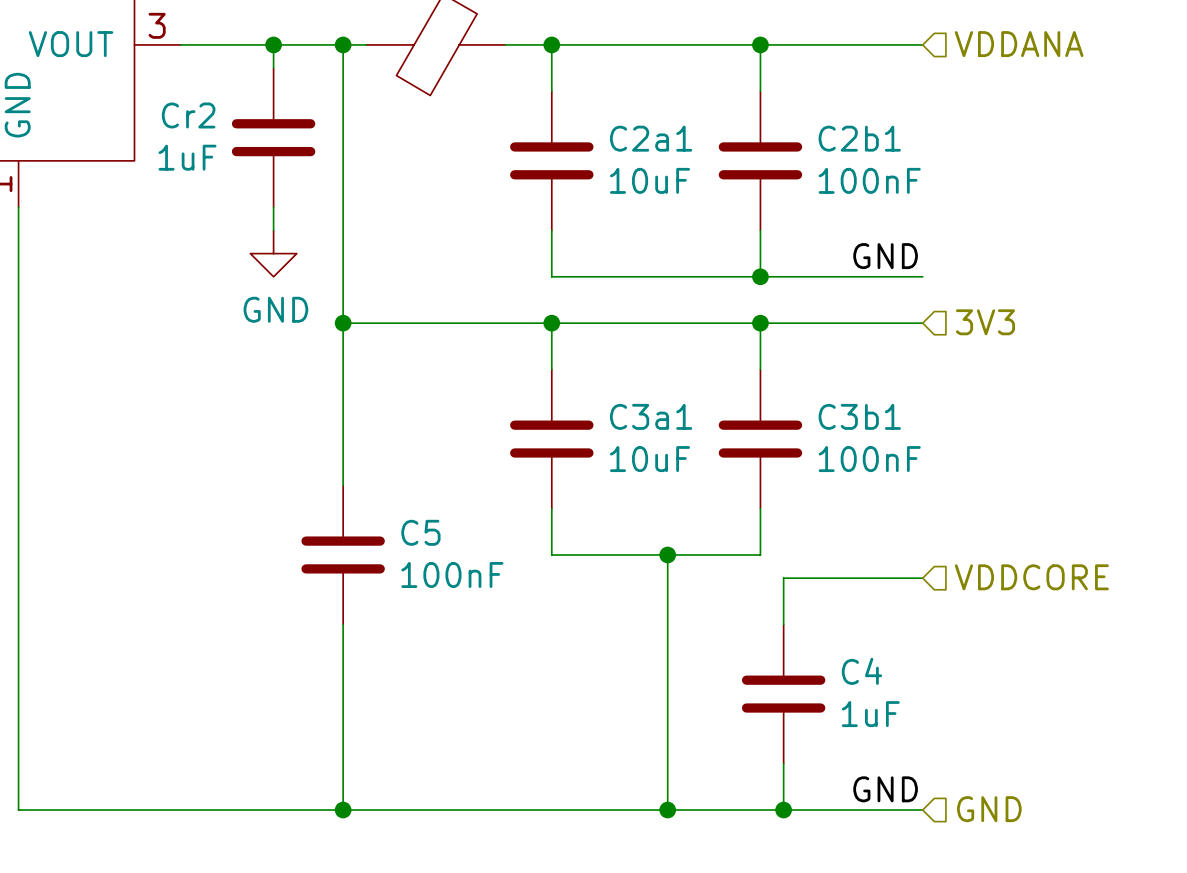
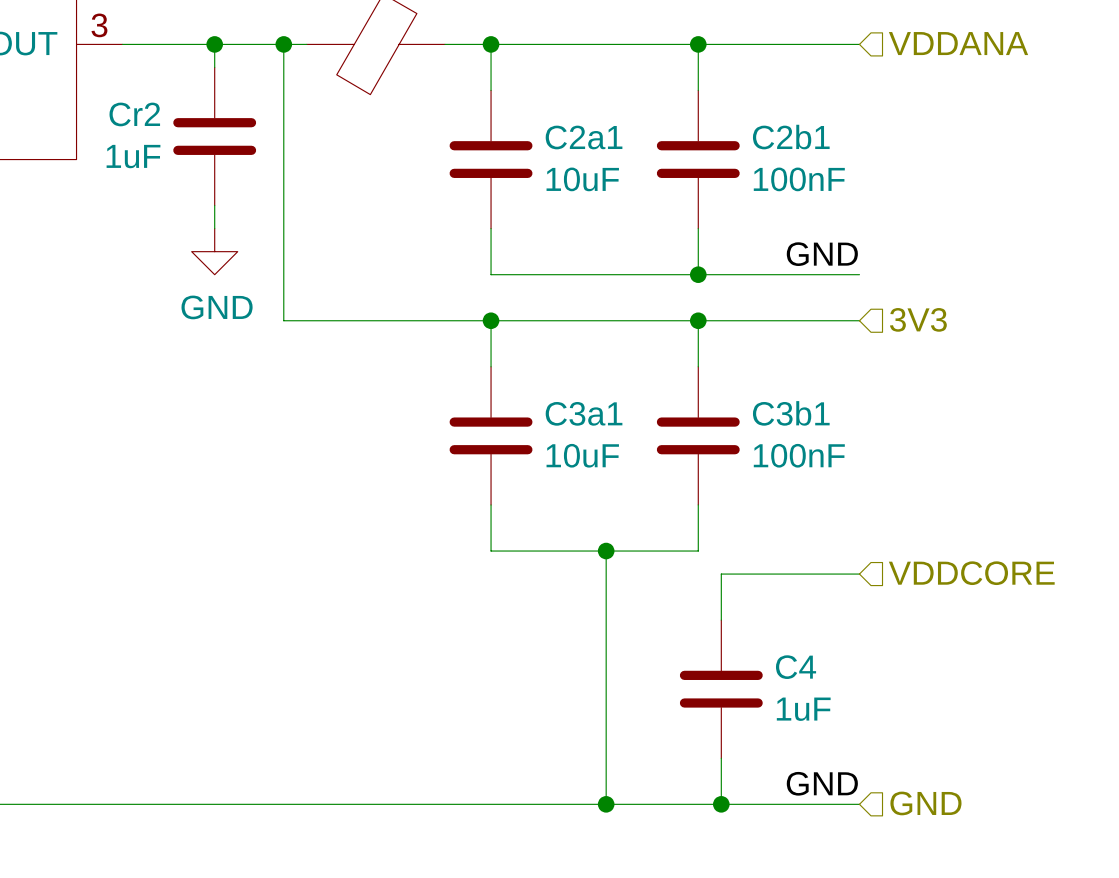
wire: (343, 323) (343, 485) -> none
junction: (343, 323) -> none
C5: 100nF (343, 554) -> none
wire: (343, 624) (343, 810) -> none
junction: (343, 810) -> none

